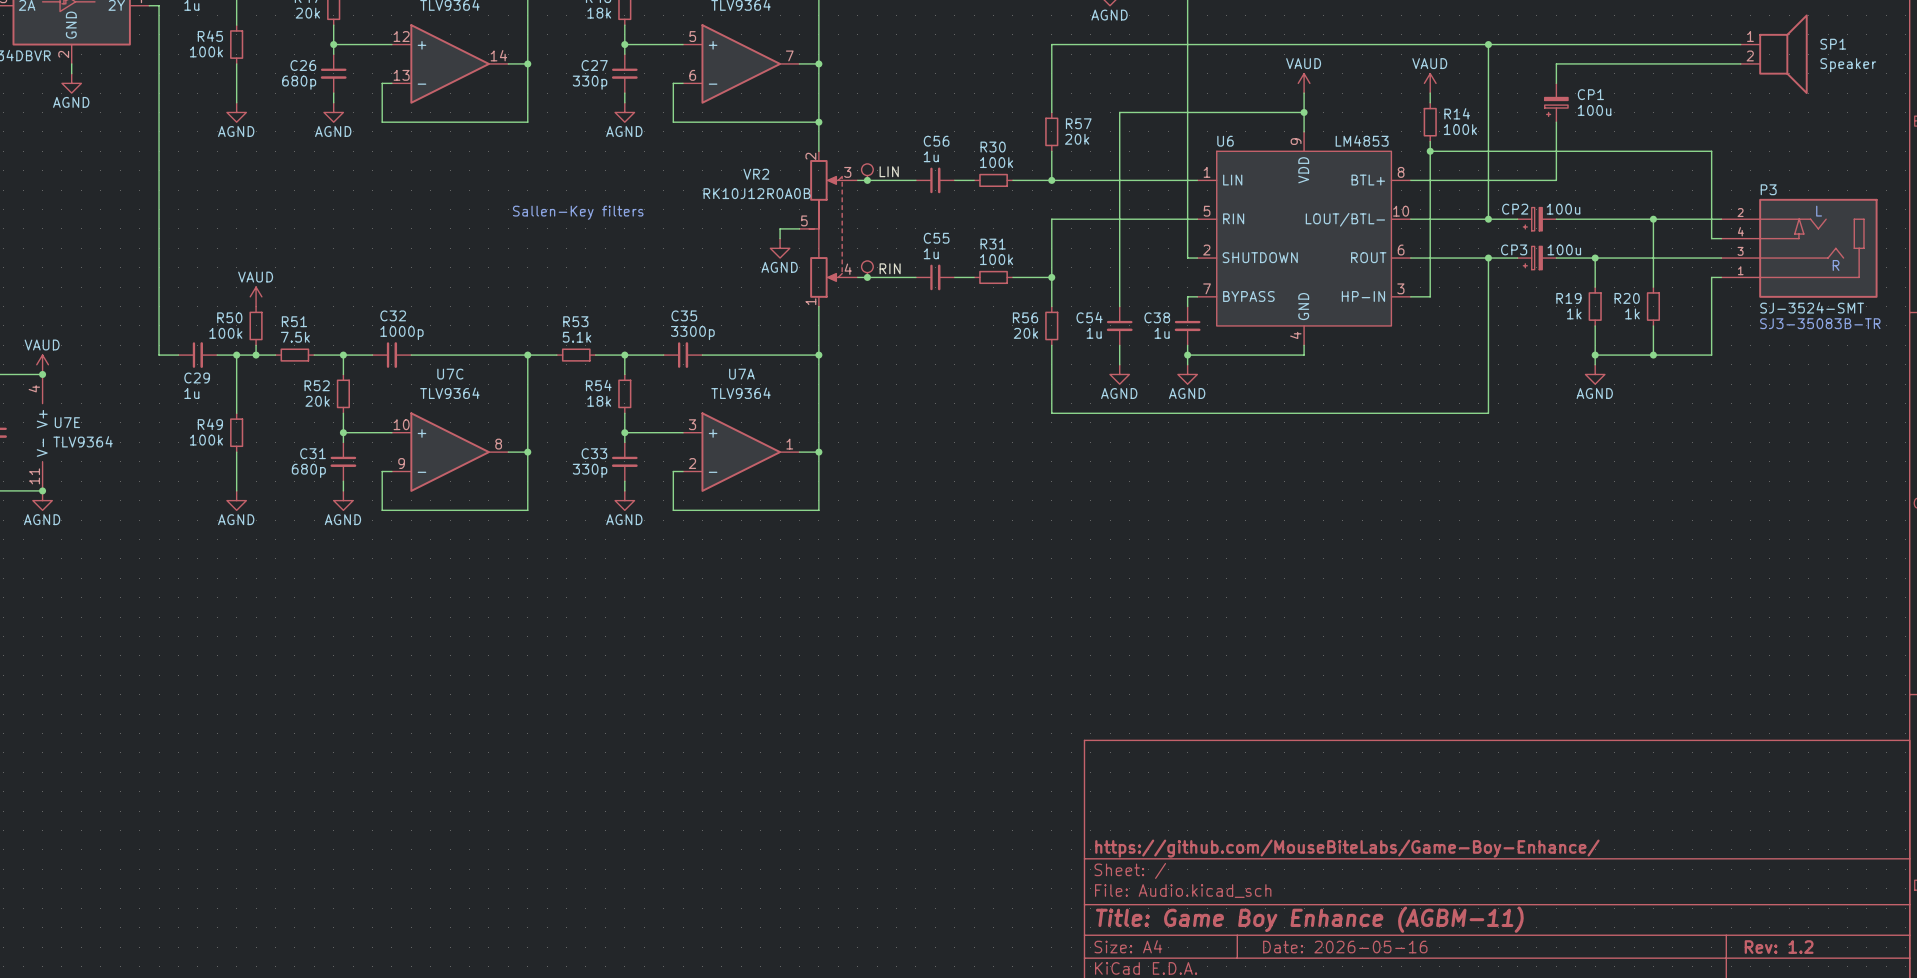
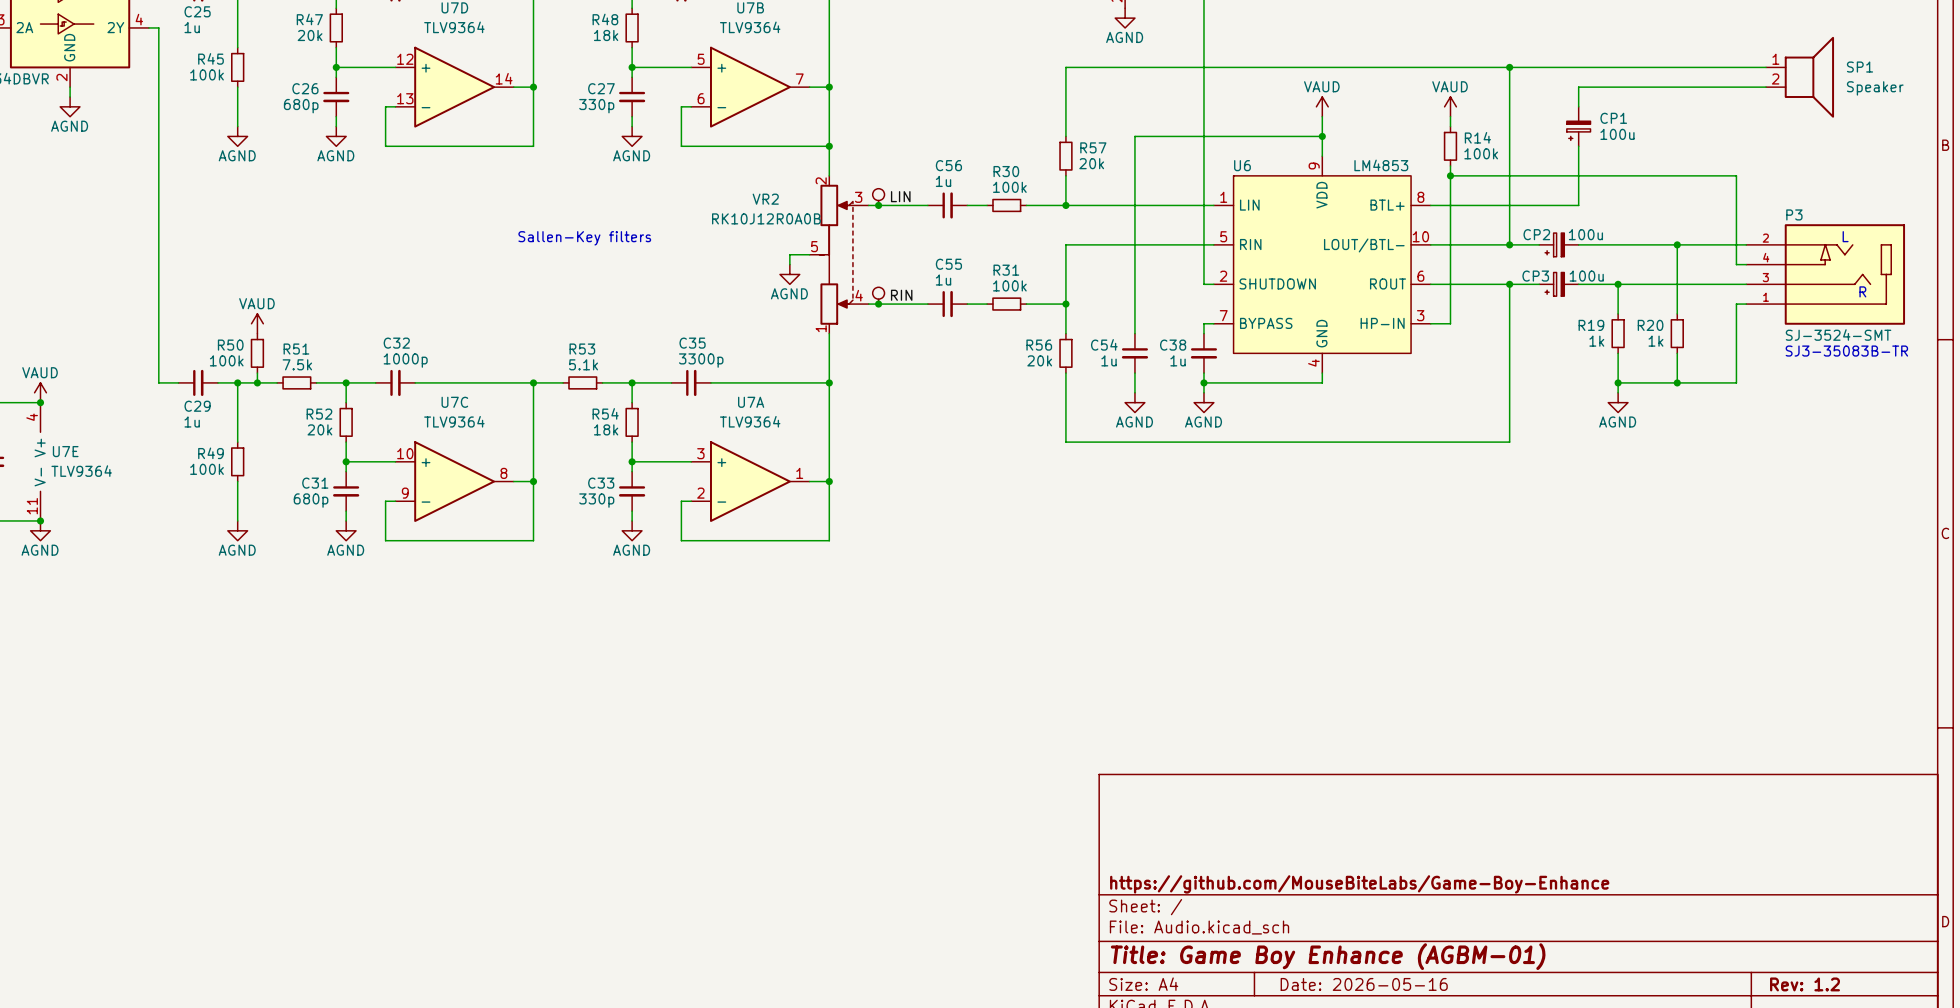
title block: https://github.com/MouseBiteLabs/Game-Boy-Enhance/ (1347, 848) -> https://github.com/MouseBiteLabs/Game-Boy-Enhance (1359, 884)
title block: Title: Game Boy Enhance (AGBM-11) (1309, 919) -> Title: Game Boy Enhance (AGBM-01) (1328, 956)

